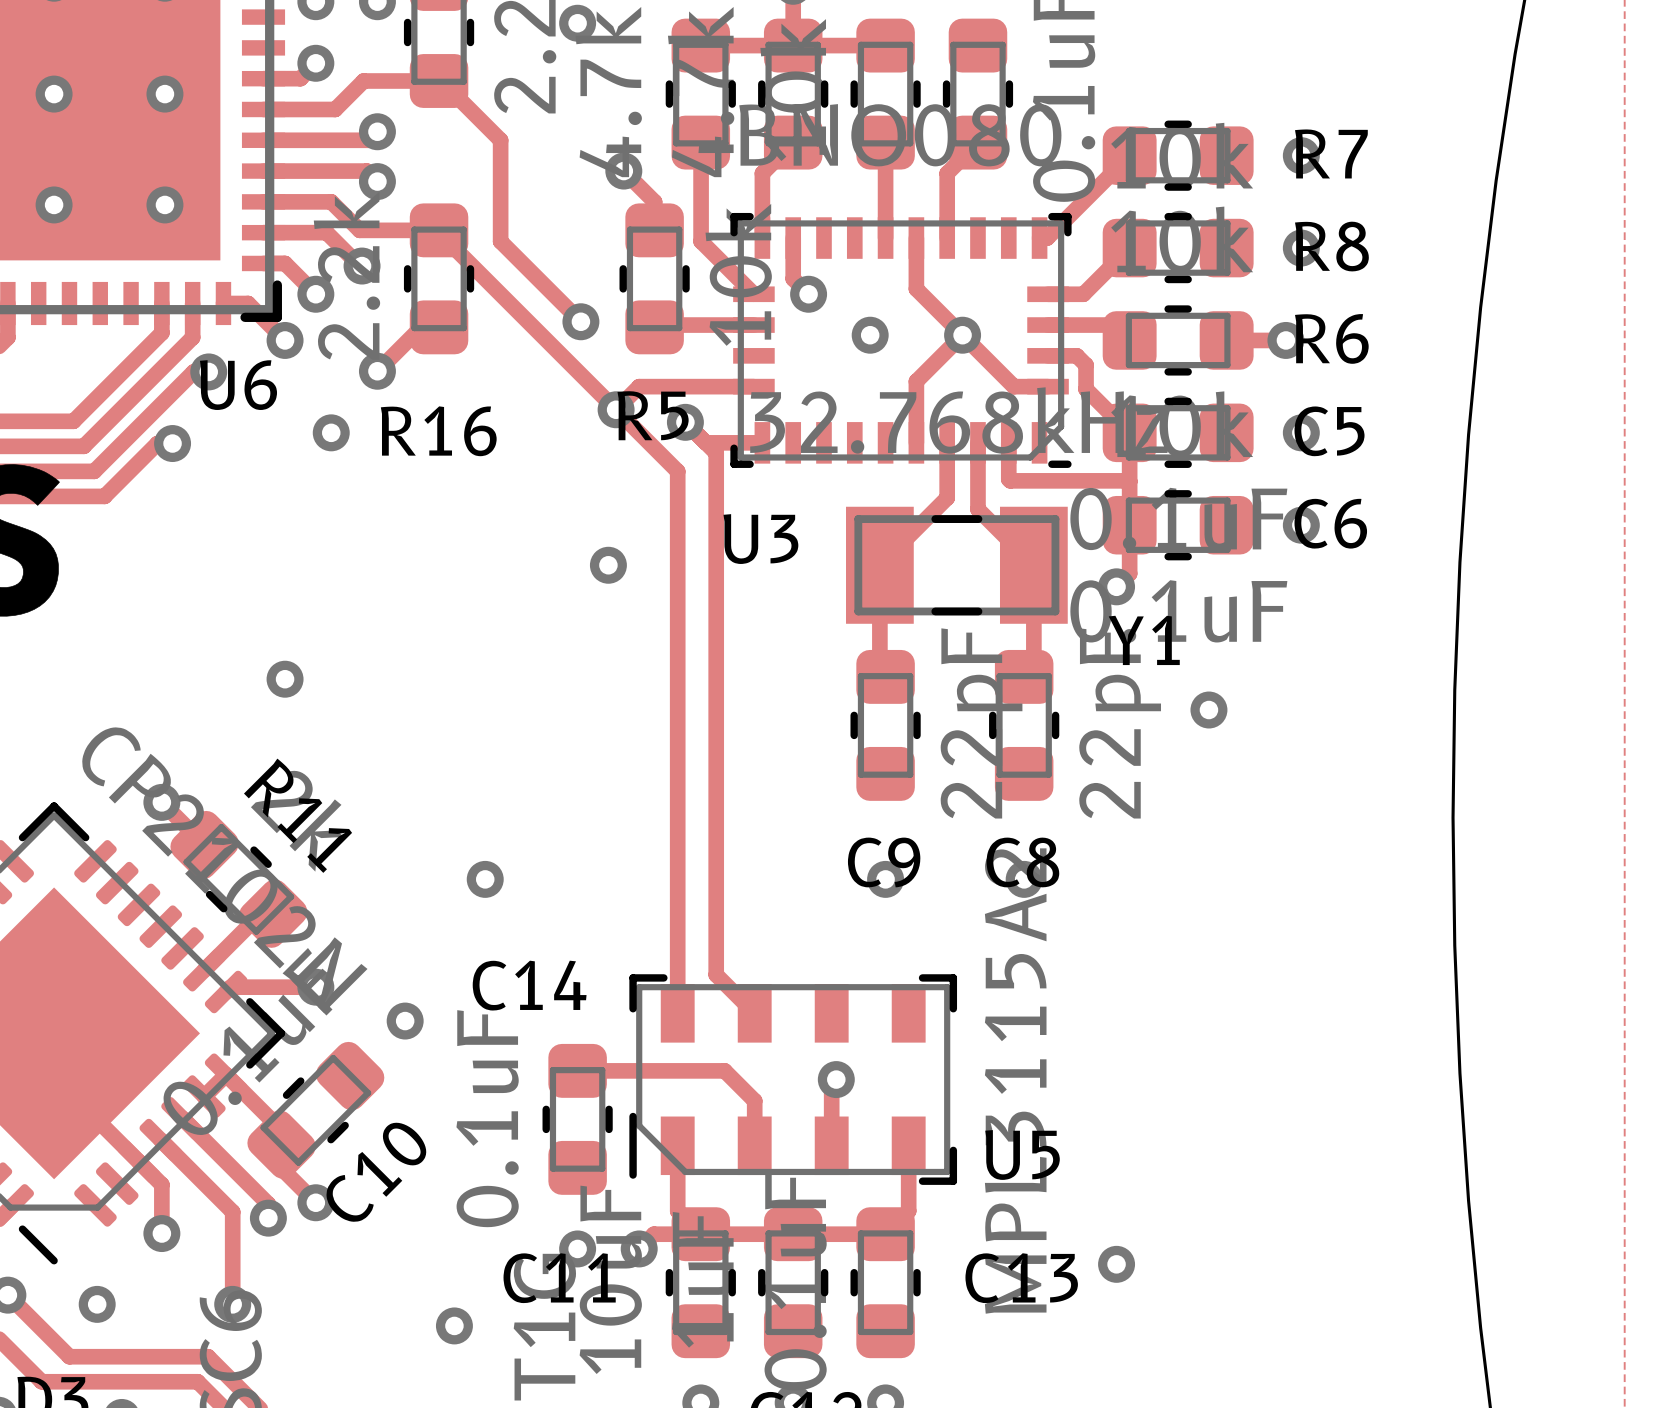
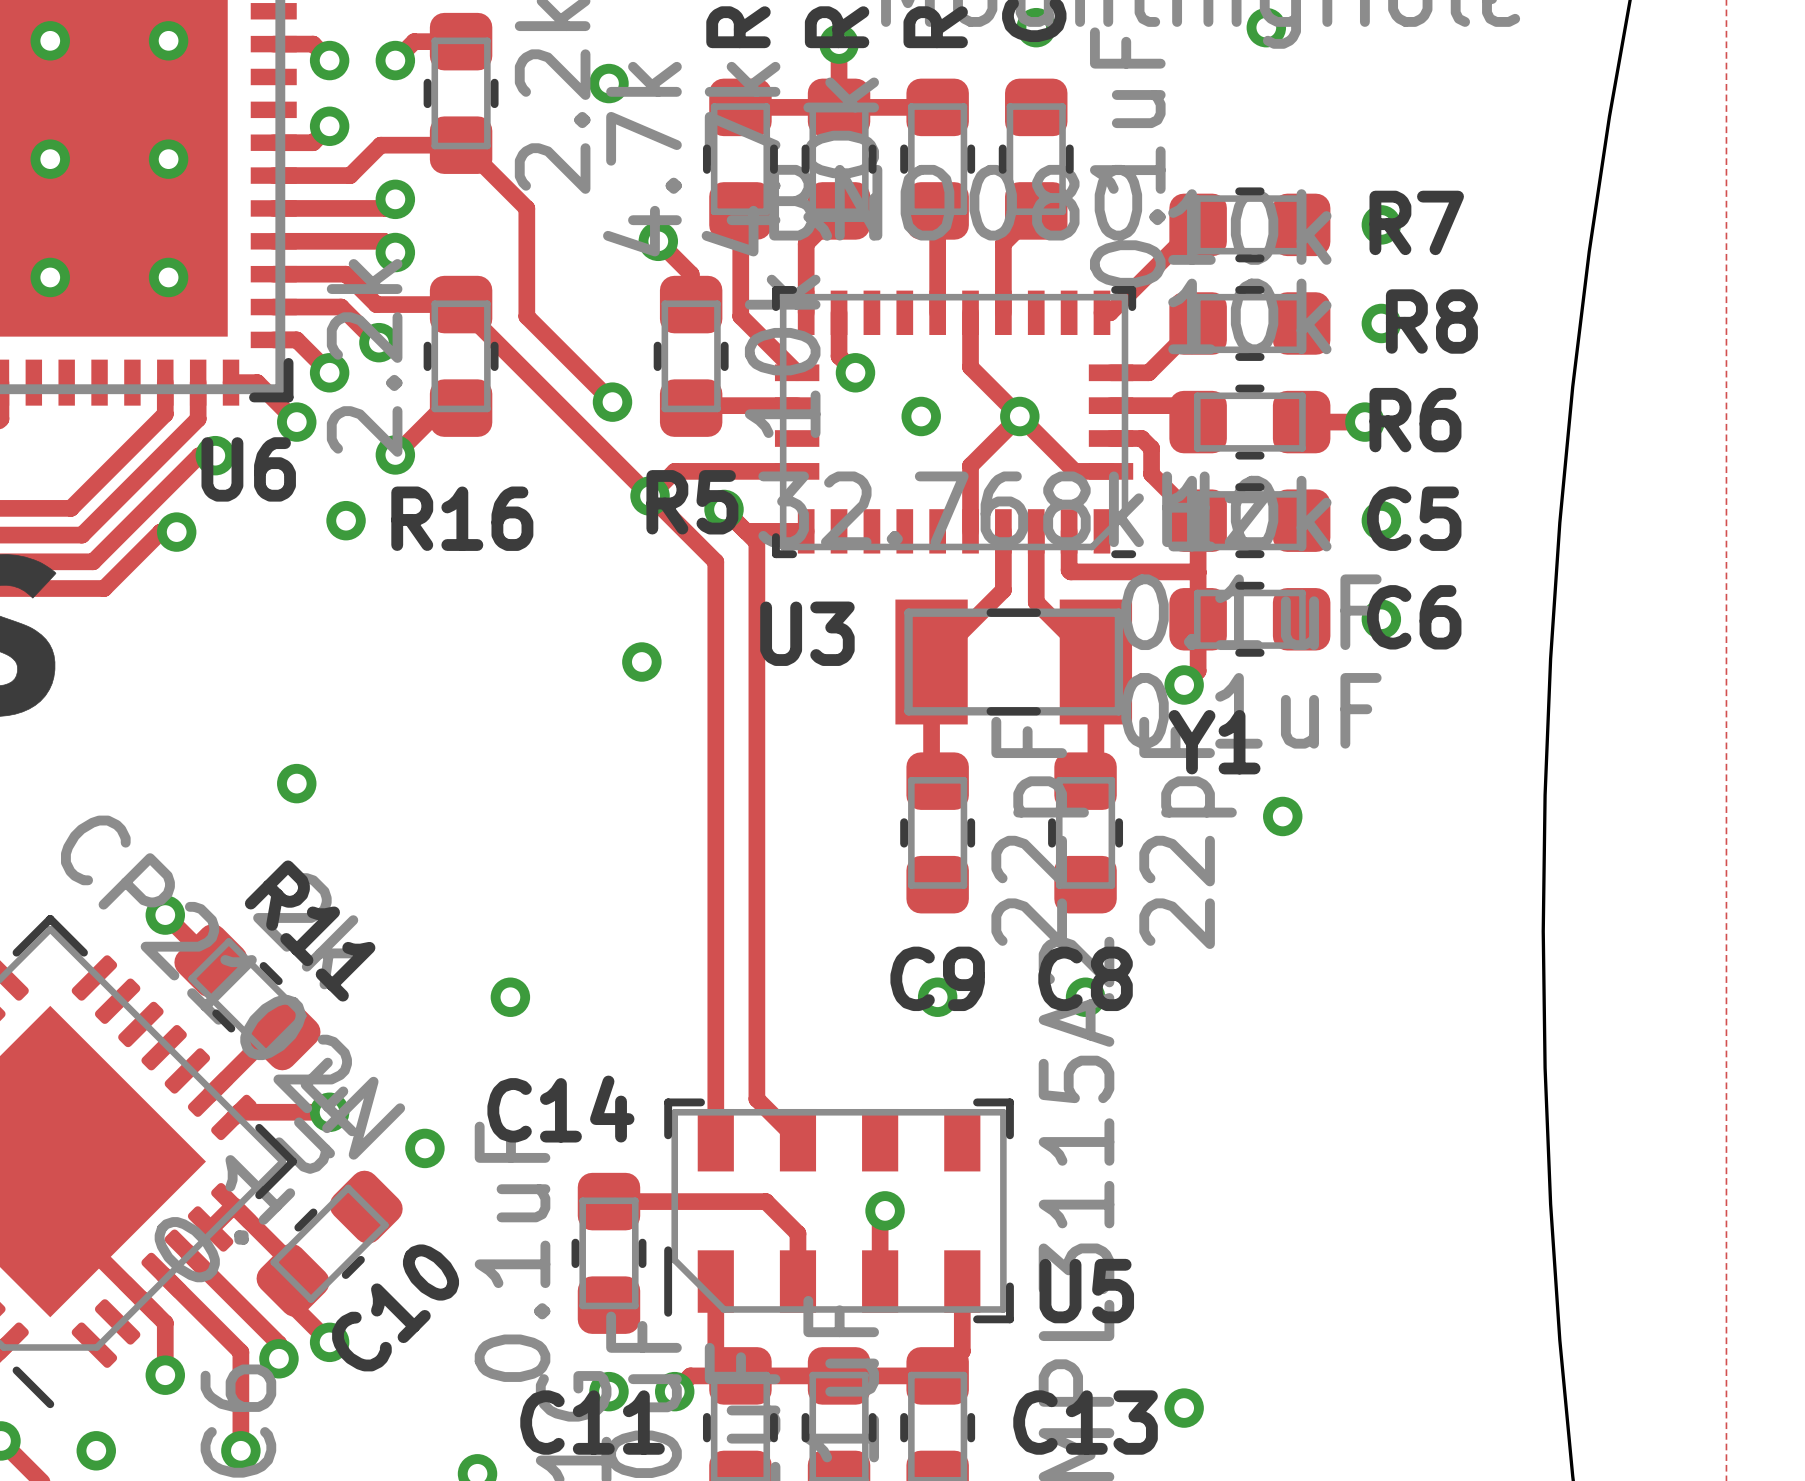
R8 name position: R8 (1331, 246) -> R8 (1431, 321)

